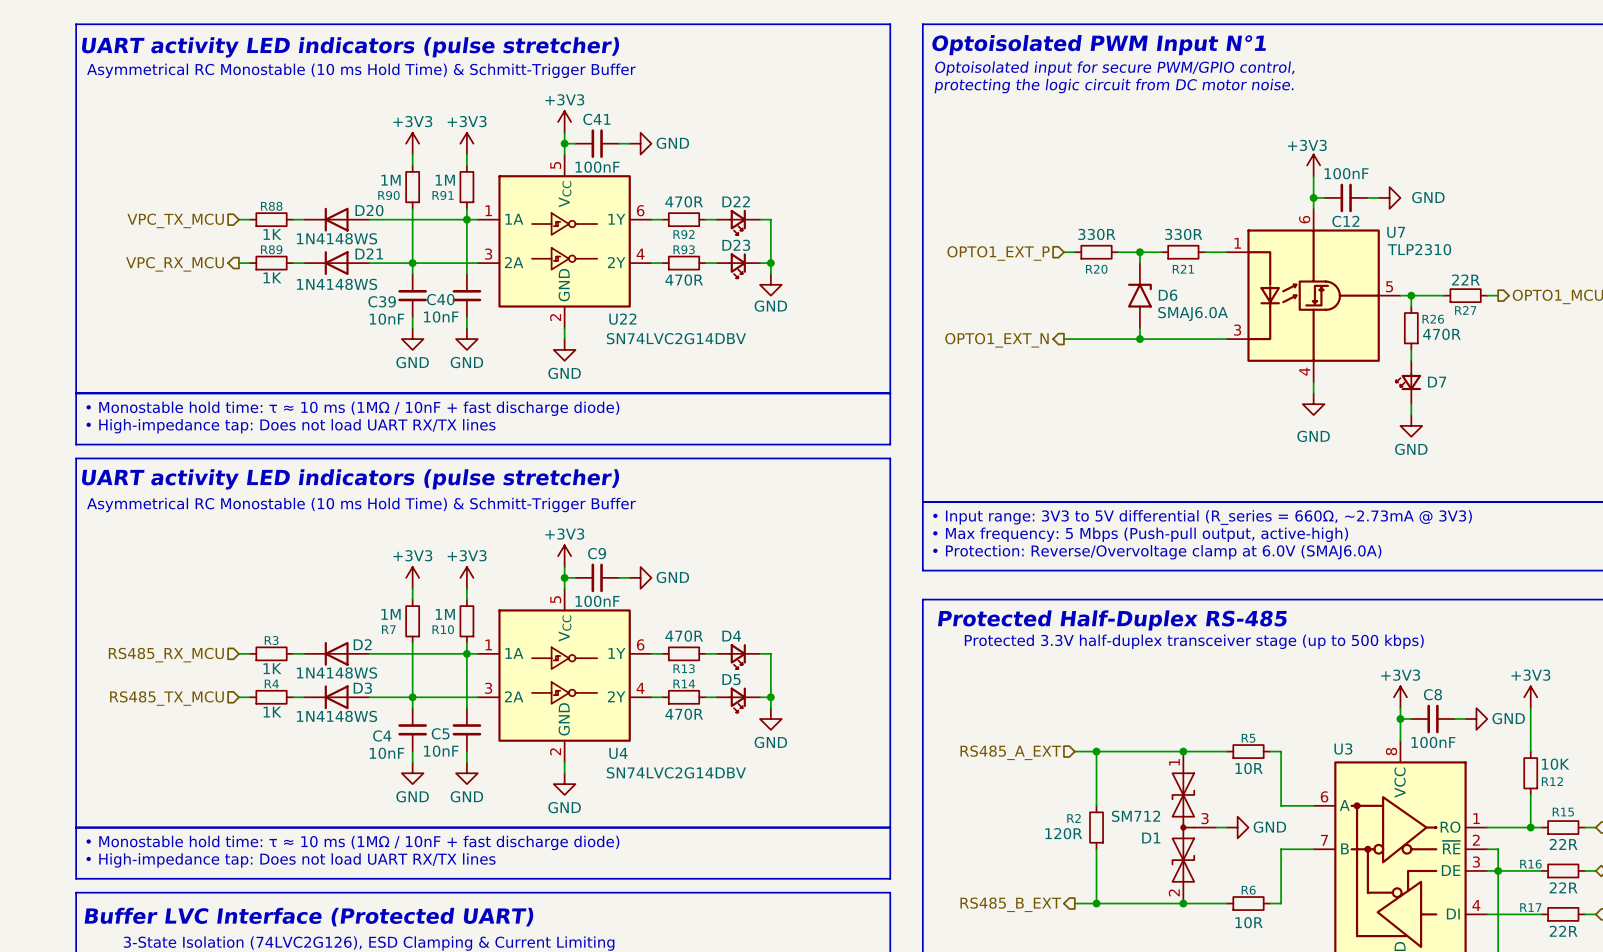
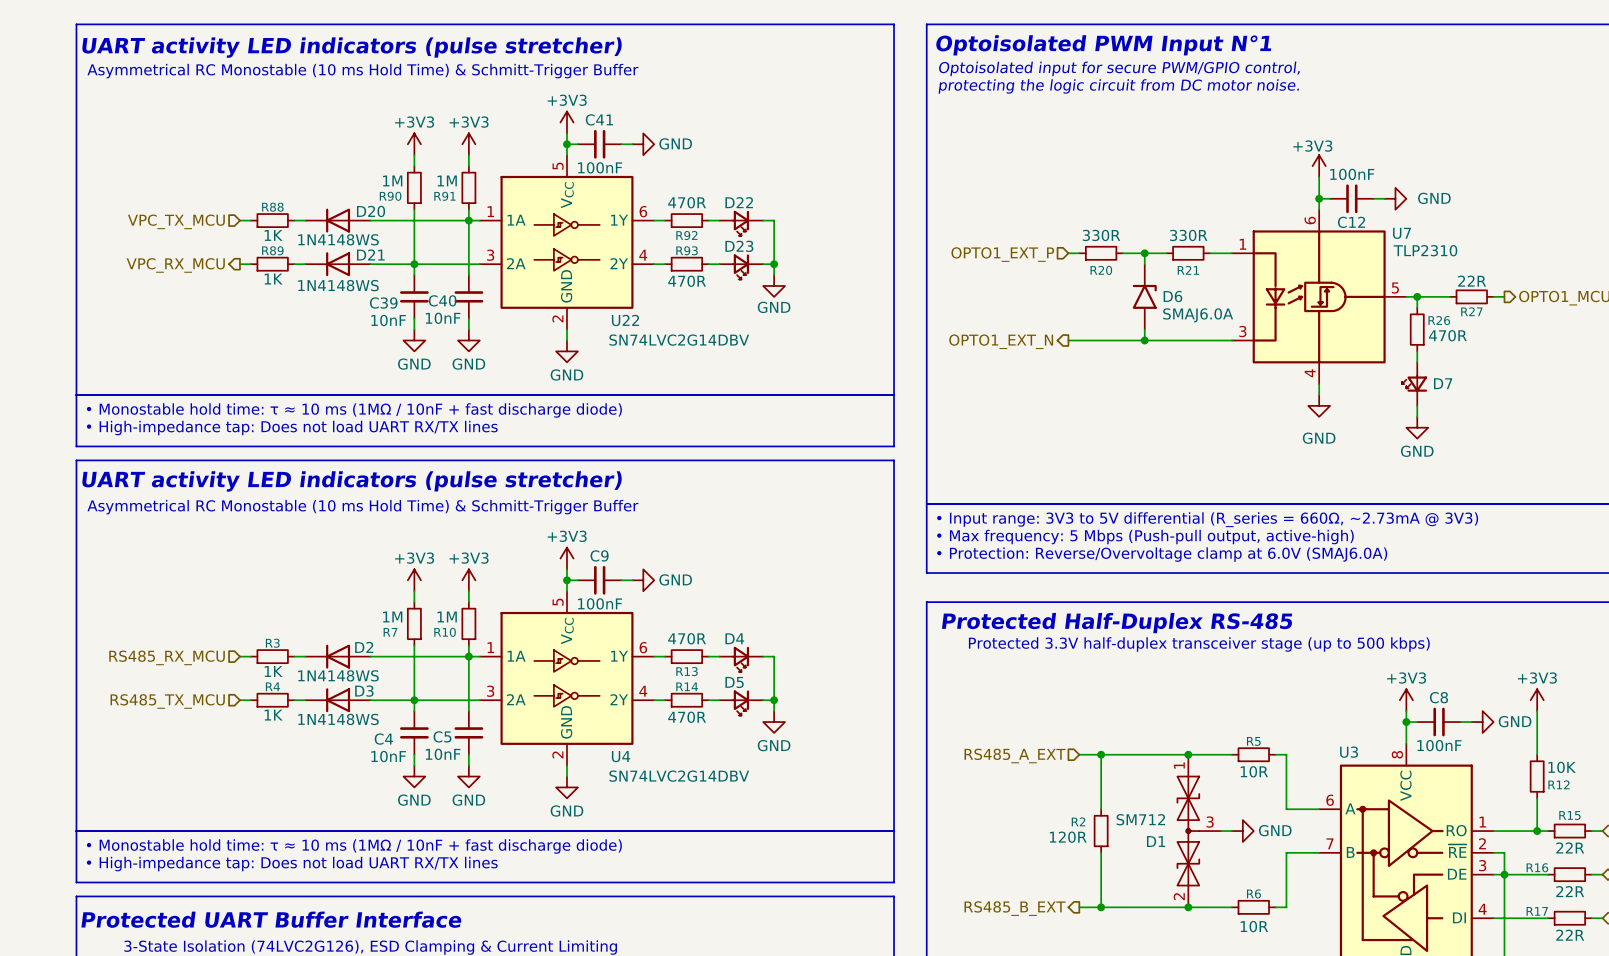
text: none -> Protected UART Buffer Interface (271, 919)
text: Buffer LVC Interface (Protected UART) (309, 917) -> none

